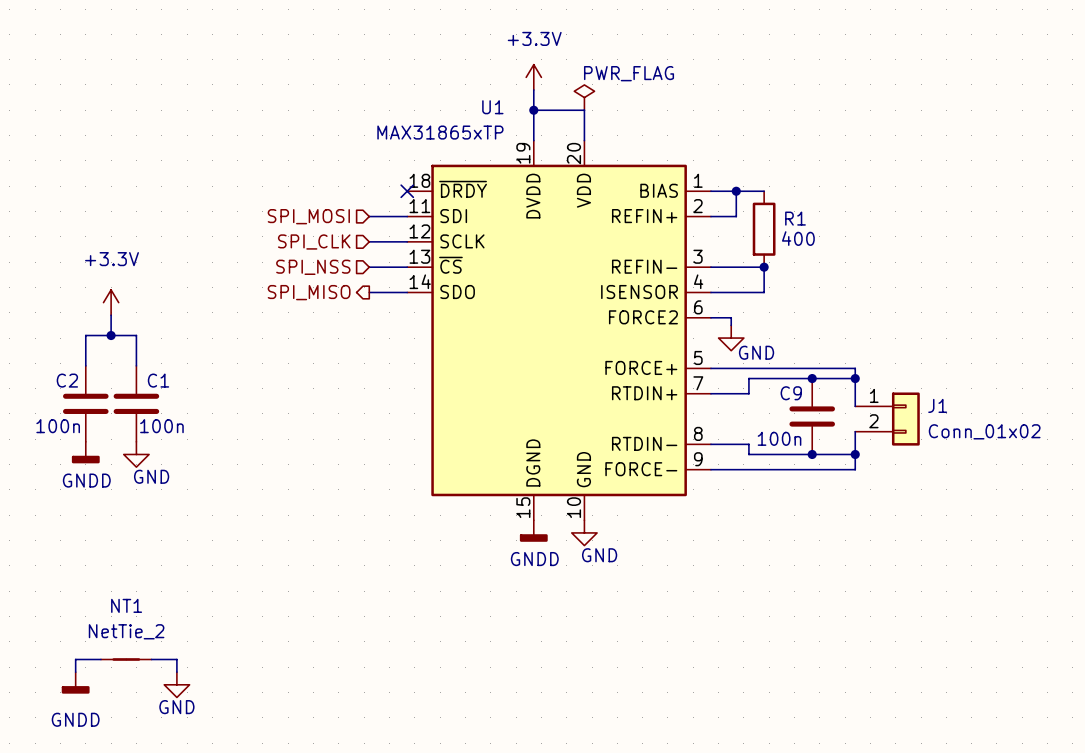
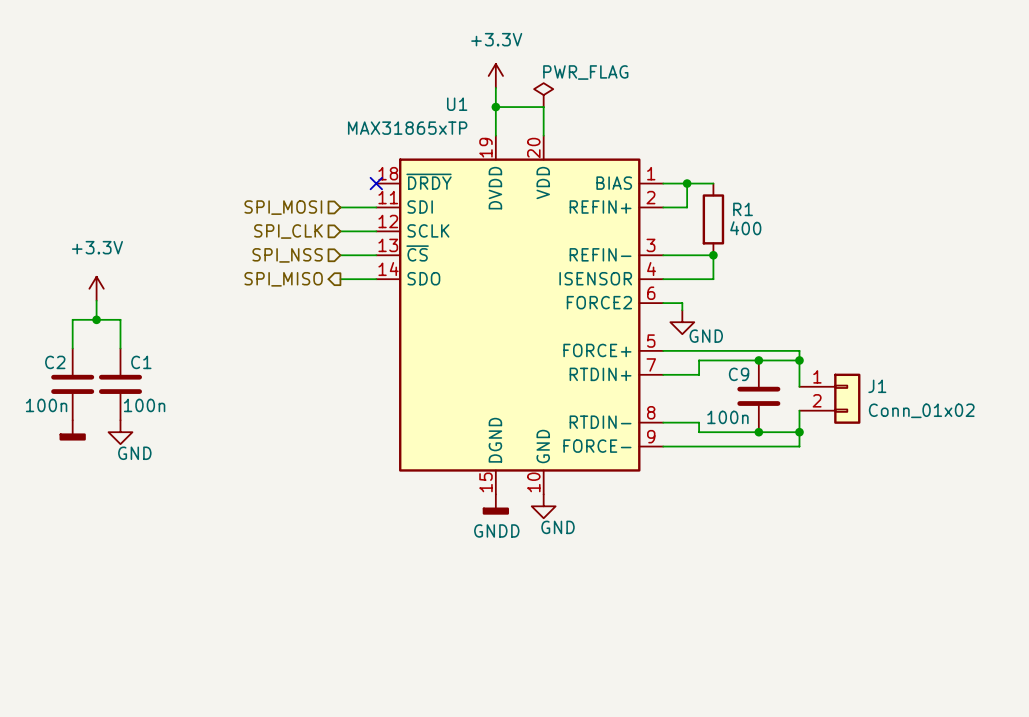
power symbol text: GNDD (86, 480) -> none
wire: (100, 659) (75, 659) (75, 672) -> none
NT1: NetTie_2 (126, 659) -> none
wire: (151, 659) (176, 659) (176, 672) -> none
power symbol: GNDD (75, 682) -> none
power symbol: GND (176, 684) -> none

